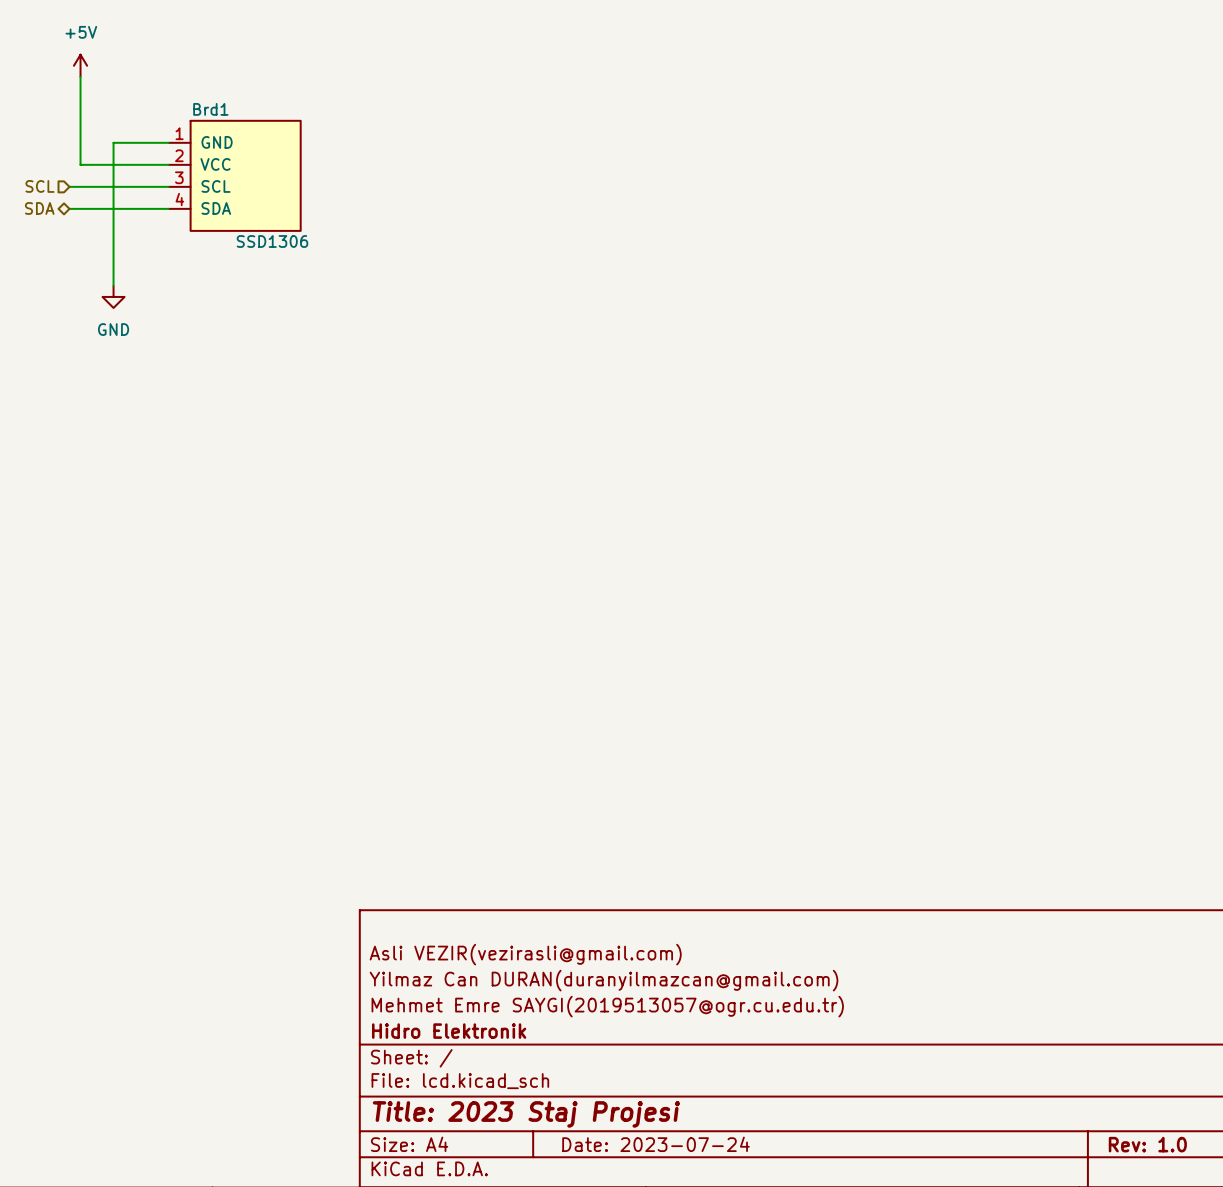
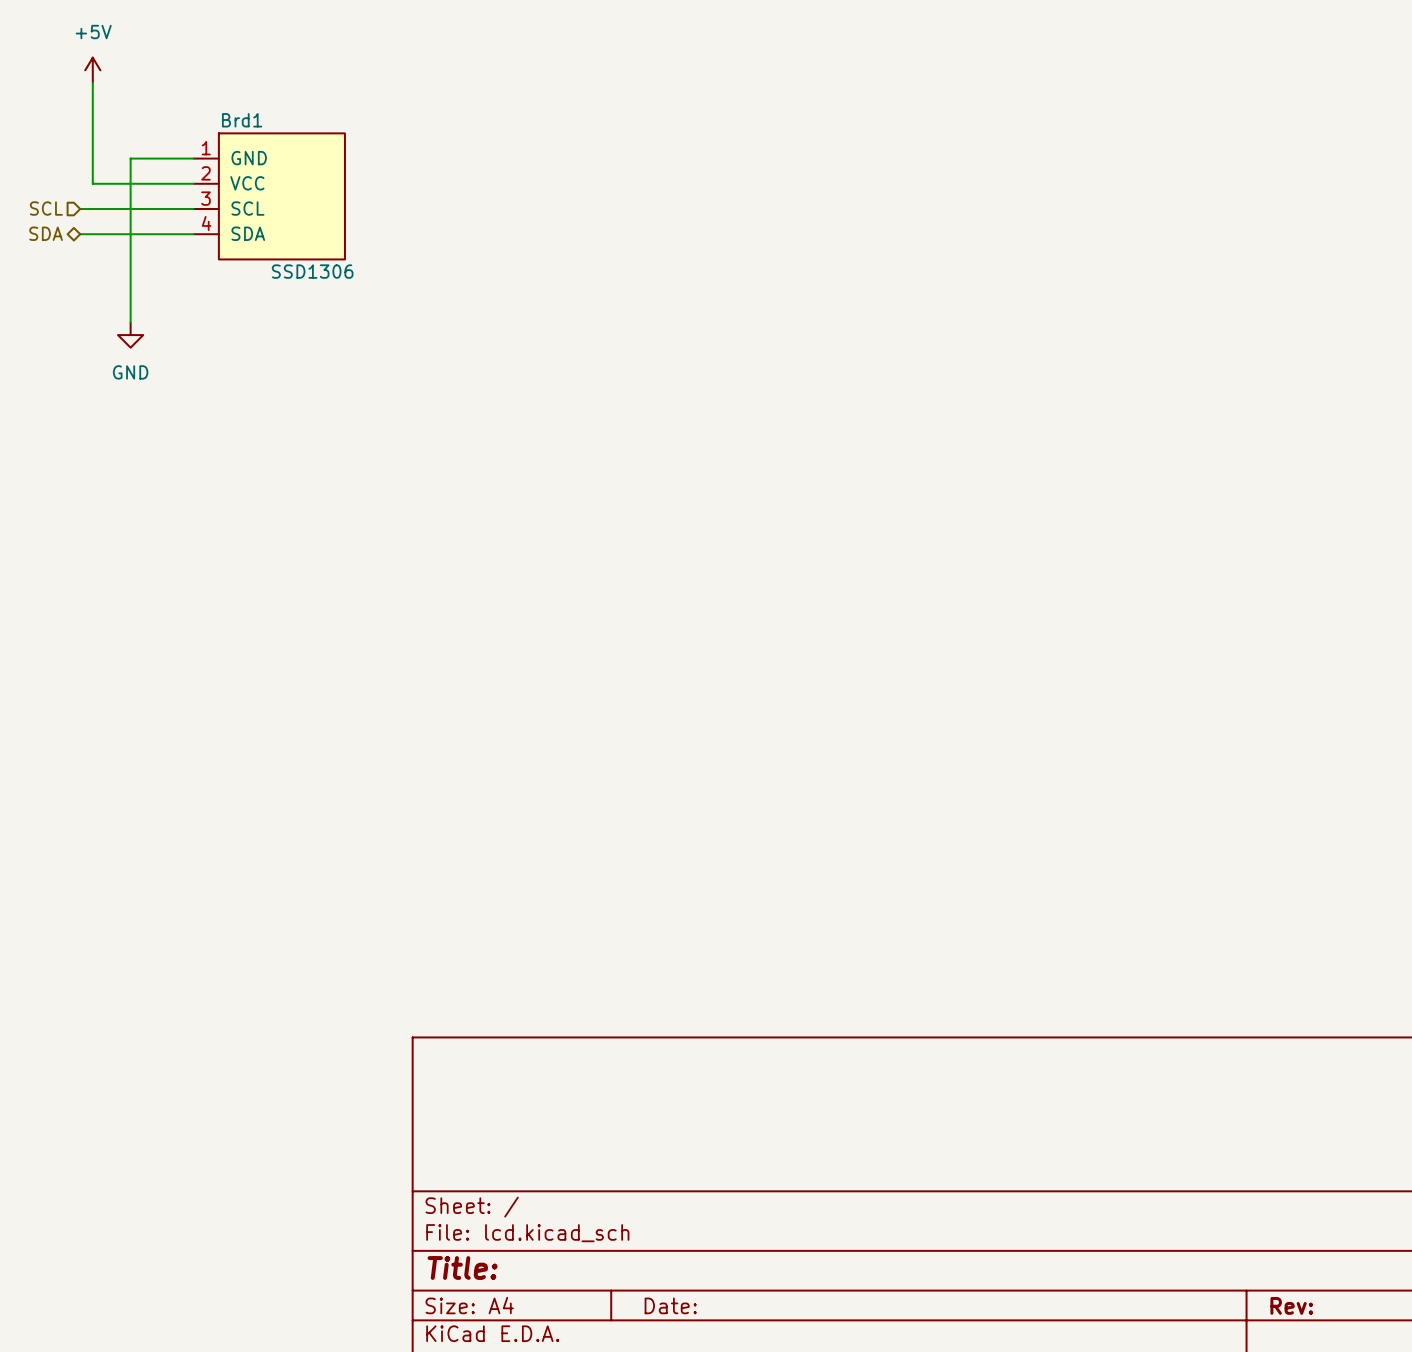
title block: Asli VEZIR(vezirasli@gmail.com) (525, 954) -> none
title block: Yilmaz Can DURAN(duranyilmazcan@gmail.com) (604, 980) -> none
title block: Mehmet Emre SAYGI(2019513057@ogr.cu.edu.tr) (607, 1006) -> none
title block: Hidro Elektronik (449, 1031) -> none
title block: Title: 2023 Staj Projesi (526, 1114) -> Title: (462, 1268)
title block: Date: 2023-07-24 (656, 1144) -> Date: (670, 1305)
title block: Rev: 1.0 (1147, 1144) -> Rev: (1291, 1305)

